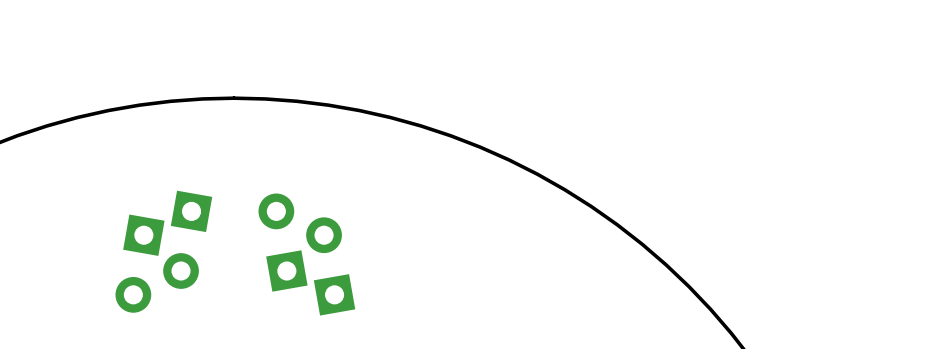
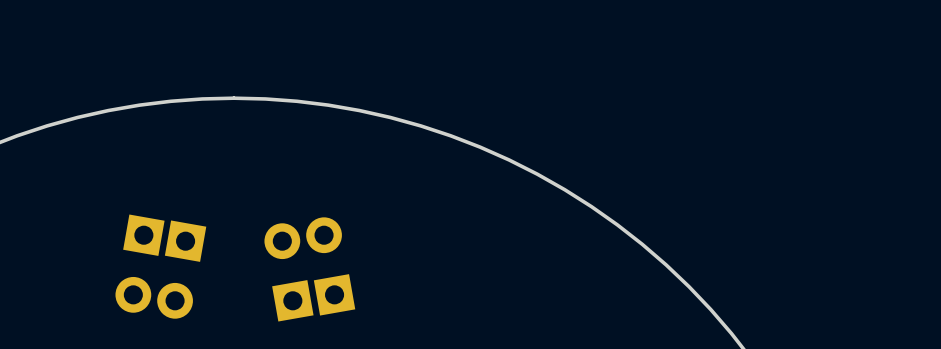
part position: (187, 239) -> (181, 269)
part position: (283, 242) -> (289, 272)

